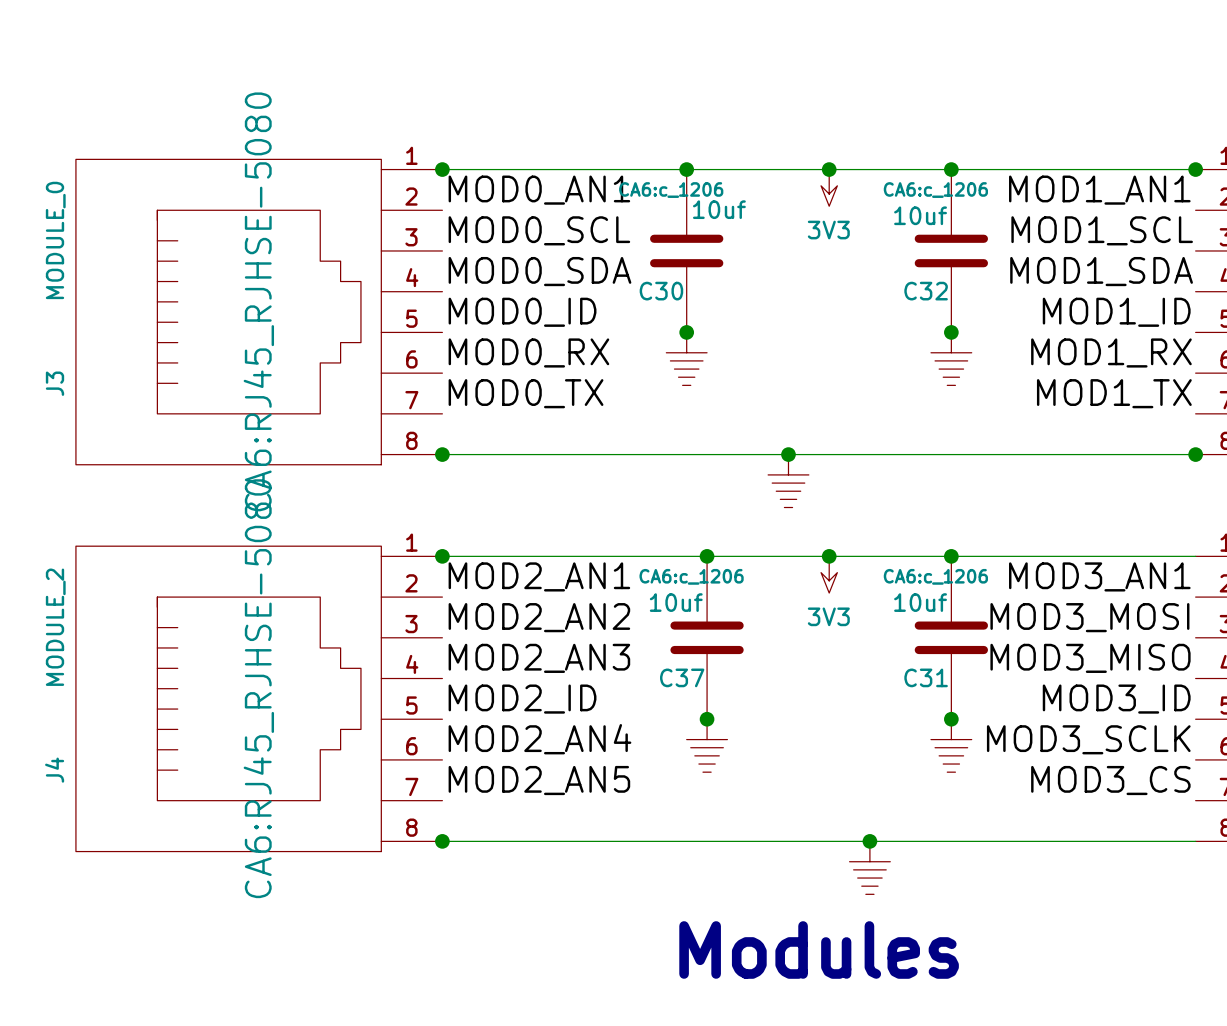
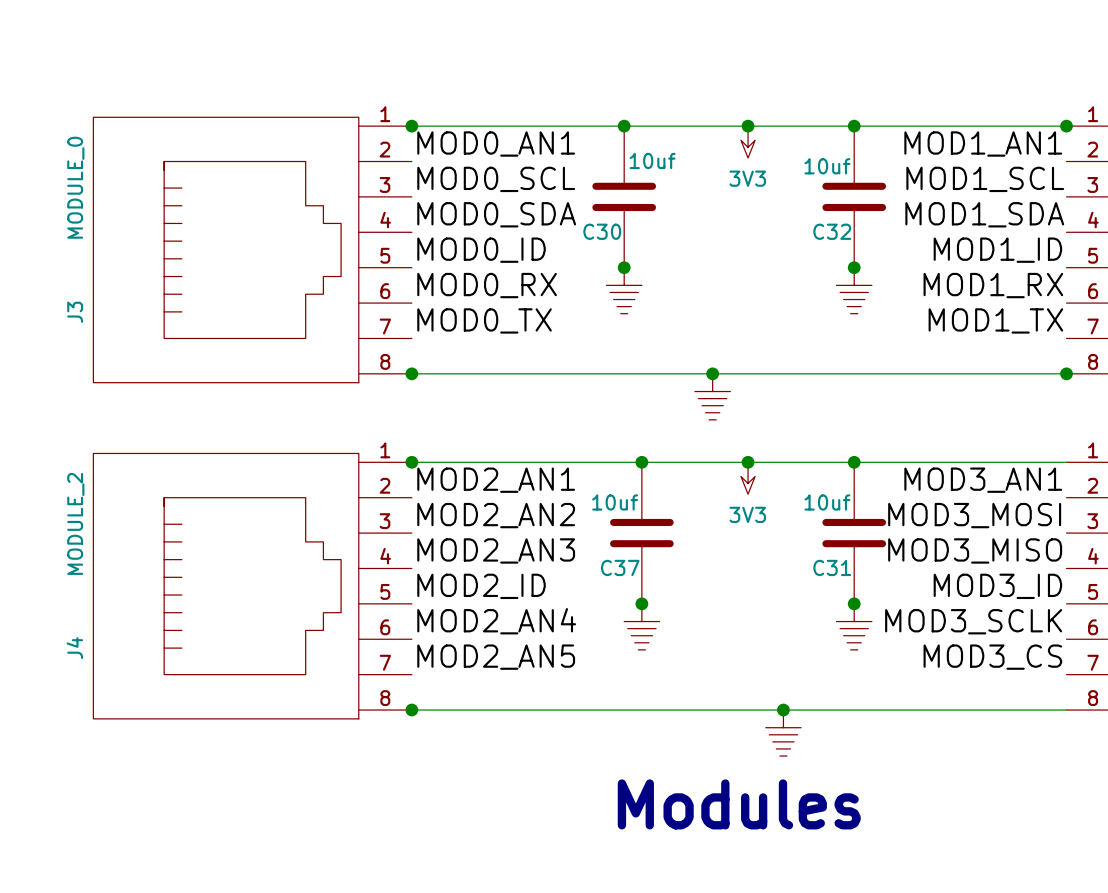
C30 text: CA6:c_1206 (671, 190) -> none
C32 text: CA6:c_1206 (935, 190) -> none
J3 text: CA6:RJ45_RJHSE-5080 (258, 301) -> none
C37 text: CA6:c_1206 (691, 576) -> none
C31 text: CA6:c_1206 (935, 576) -> none
J4 text: CA6:RJ45_RJHSE-5080 (258, 688) -> none

